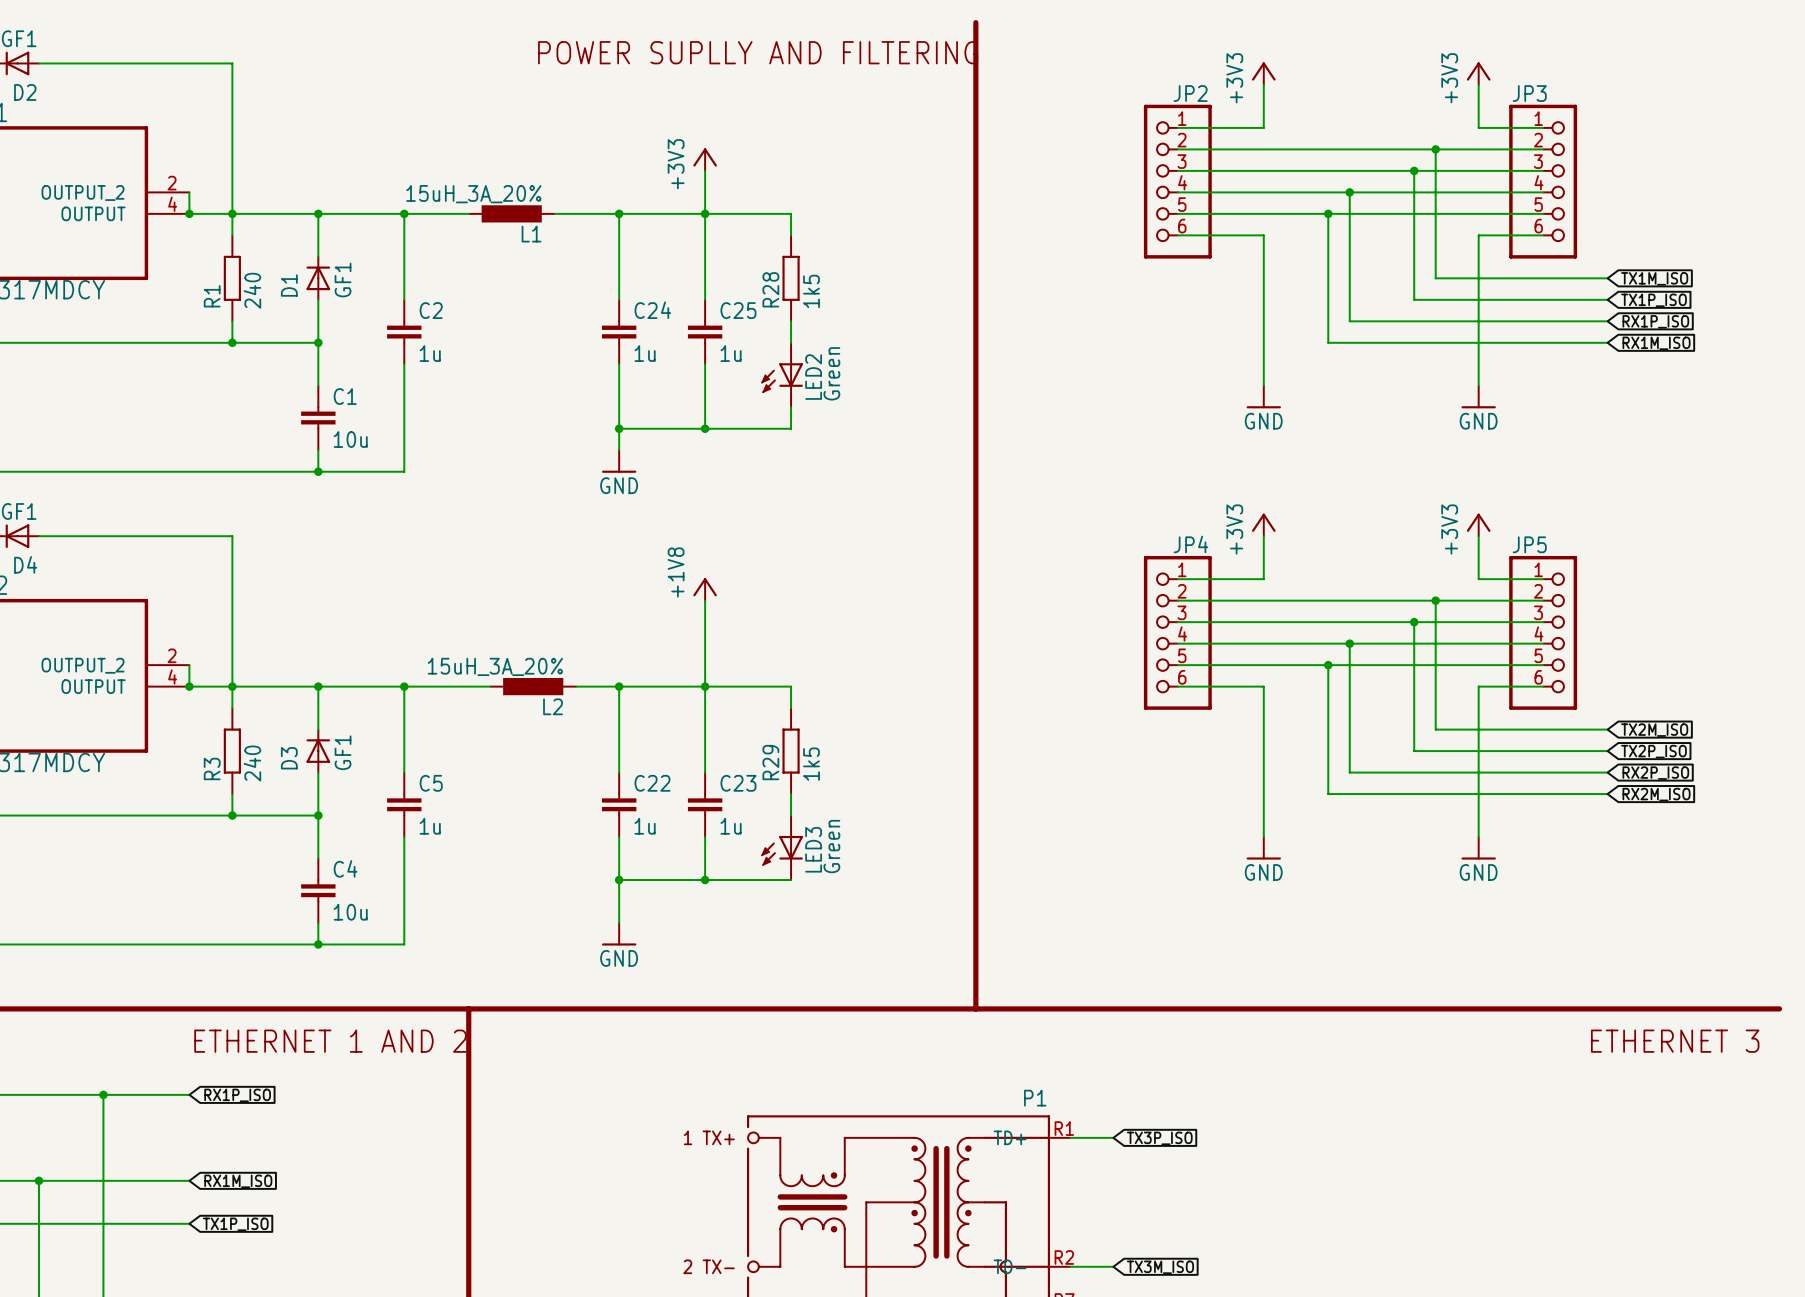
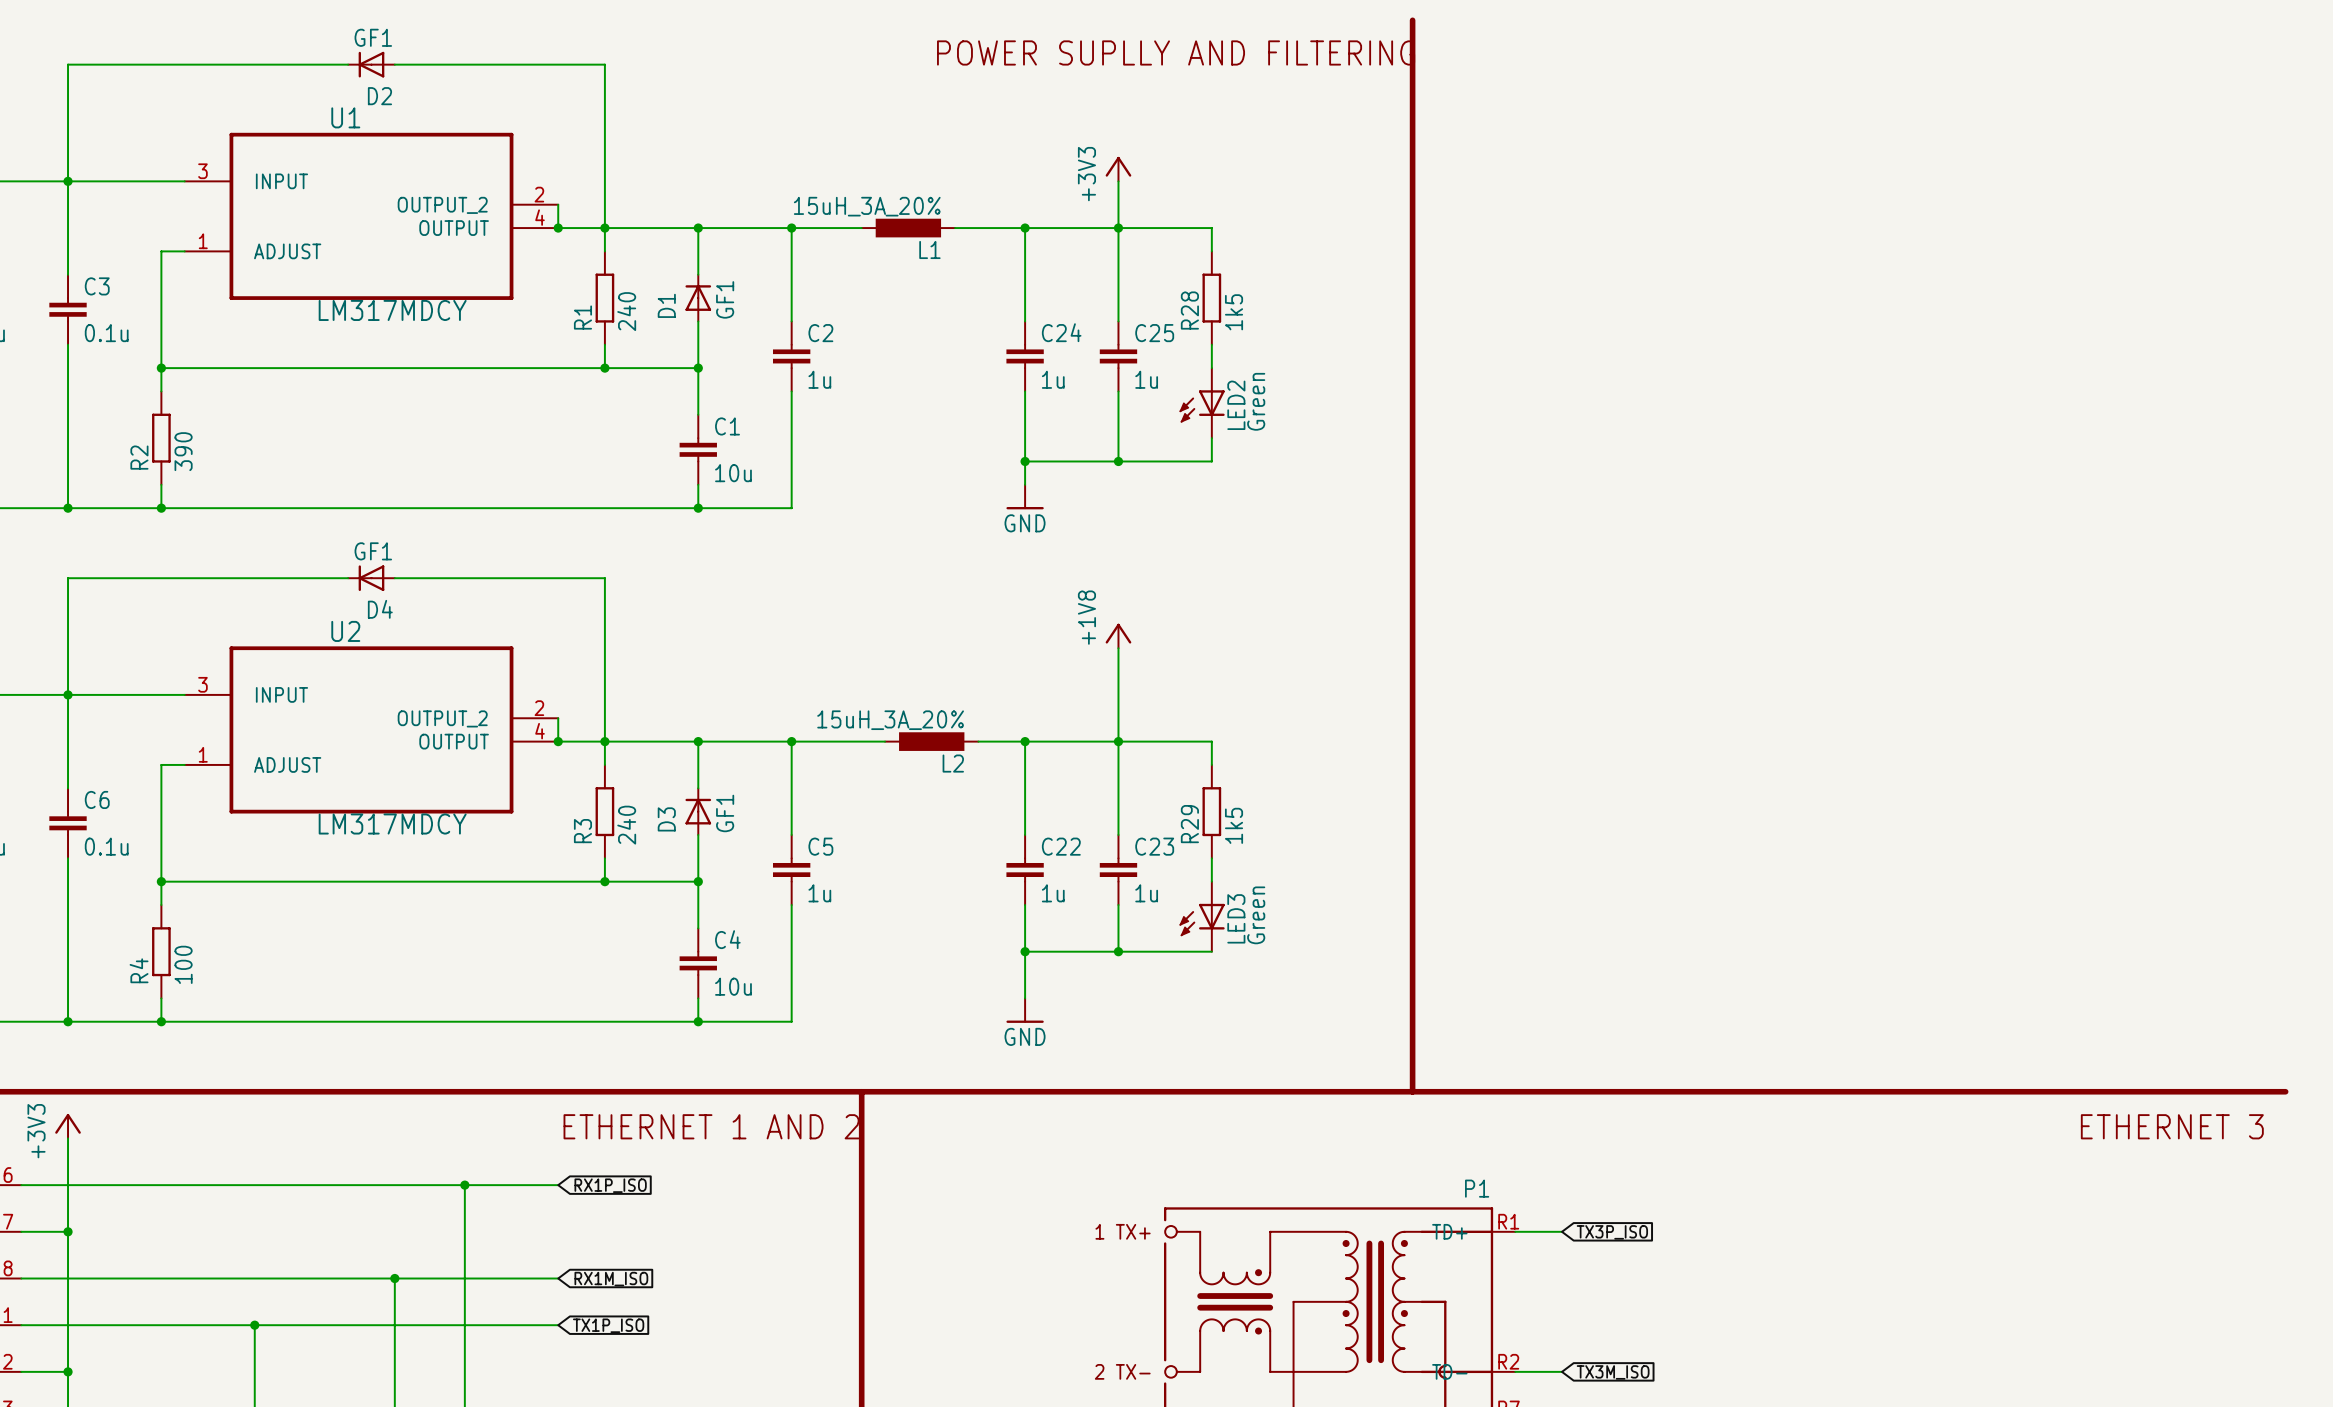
power symbol: +3V3 (1263, 73) -> none
power symbol: +3V3 (1478, 73) -> none
wire: (1263, 84) (1263, 127) (1177, 127) -> none
wire: (1478, 84) (1478, 127) (1543, 127) -> none
wire: (1177, 149) (1543, 149) -> none
wire: (1435, 149) (1435, 278) (1607, 278) -> none
junction: (1435, 149) -> none
wire: (1177, 170) (1543, 170) -> none
wire: (1414, 170) (1414, 299) (1607, 299) -> none
junction: (1414, 170) -> none
JP2: (1177, 181) -> none
JP3: (1543, 181) -> none
wire: (1177, 192) (1543, 192) -> none
wire: (1349, 192) (1349, 321) (1607, 321) -> none
junction: (1349, 192) -> none
wire: (1177, 213) (1543, 213) -> none
wire: (1328, 213) (1328, 342) (1607, 342) -> none
junction: (1328, 213) -> none
wire: (1177, 235) (1263, 235) (1263, 385) -> none
wire: (1543, 235) (1478, 235) (1478, 385) -> none
global label: TX1M_ISO (1654, 278) -> none
global label: TX1P_ISO (1653, 300) -> none
global label: RX1P_ISO (1655, 321) -> none
global label: RX1M_ISO (1656, 343) -> none
power symbol: GND (1263, 397) -> none
power symbol: GND (1478, 397) -> none
power symbol: +3V3 (1263, 524) -> none
power symbol: +3V3 (1478, 524) -> none
wire: (1263, 536) (1263, 579) (1177, 579) -> none
wire: (1478, 536) (1478, 579) (1543, 579) -> none
wire: (1177, 600) (1543, 600) -> none
wire: (1435, 600) (1435, 729) (1607, 729) -> none
junction: (1435, 600) -> none
wire: (1177, 622) (1543, 622) -> none
wire: (1414, 622) (1414, 751) (1607, 751) -> none
junction: (1414, 622) -> none
JP4: (1177, 632) -> none
JP5: (1543, 632) -> none
wire: (1177, 643) (1543, 643) -> none
wire: (1349, 643) (1349, 772) (1607, 772) -> none
junction: (1349, 643) -> none
wire: (1177, 665) (1543, 665) -> none
wire: (1328, 665) (1328, 794) (1607, 794) -> none
junction: (1328, 665) -> none
wire: (1177, 686) (1263, 686) (1263, 837) -> none
wire: (1543, 686) (1478, 686) (1478, 837) -> none
global label: TX2M_ISO (1654, 730) -> none
global label: TX2P_ISO (1653, 751) -> none
global label: RX2P_ISO (1655, 773) -> none
global label: RX2M_ISO (1656, 794) -> none
power symbol: GND (1263, 848) -> none
power symbol: GND (1478, 848) -> none

